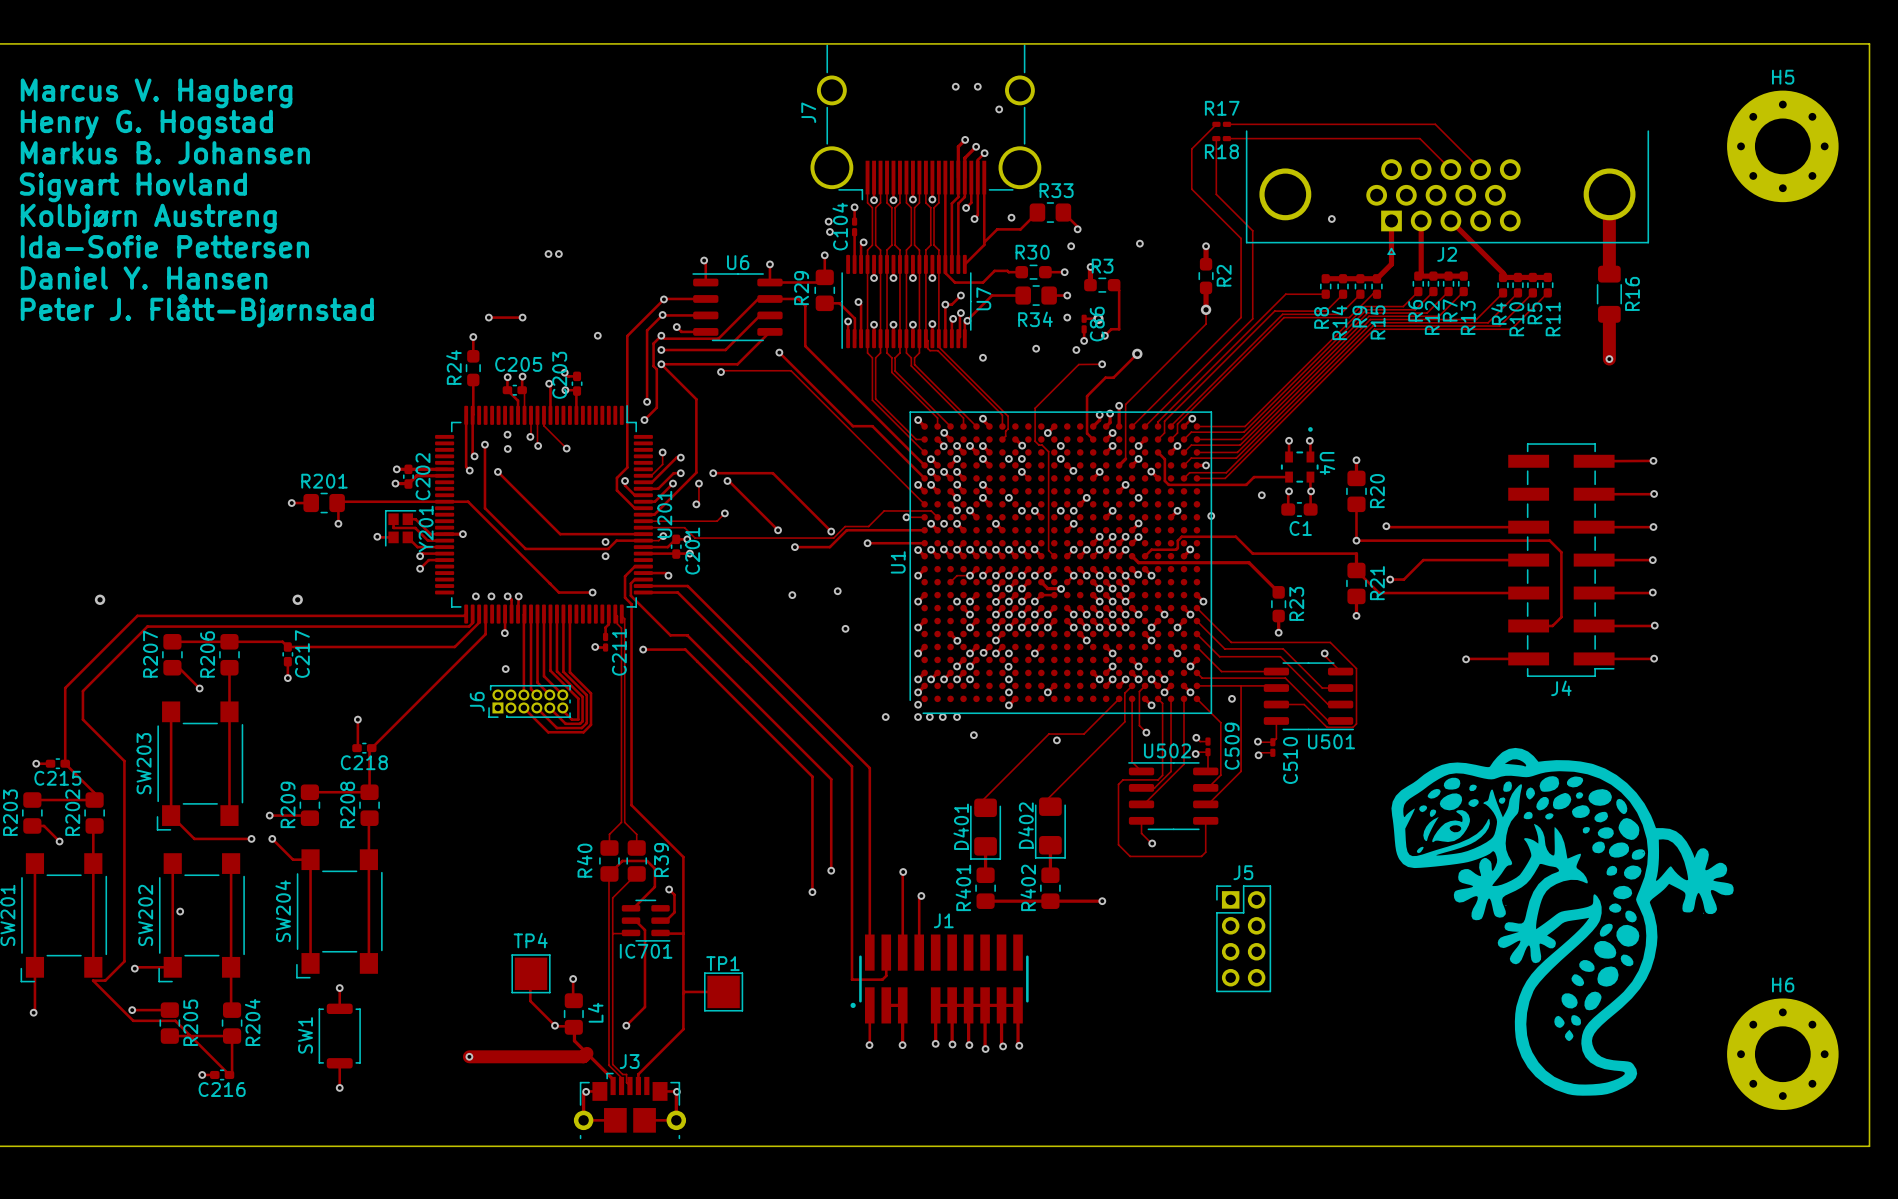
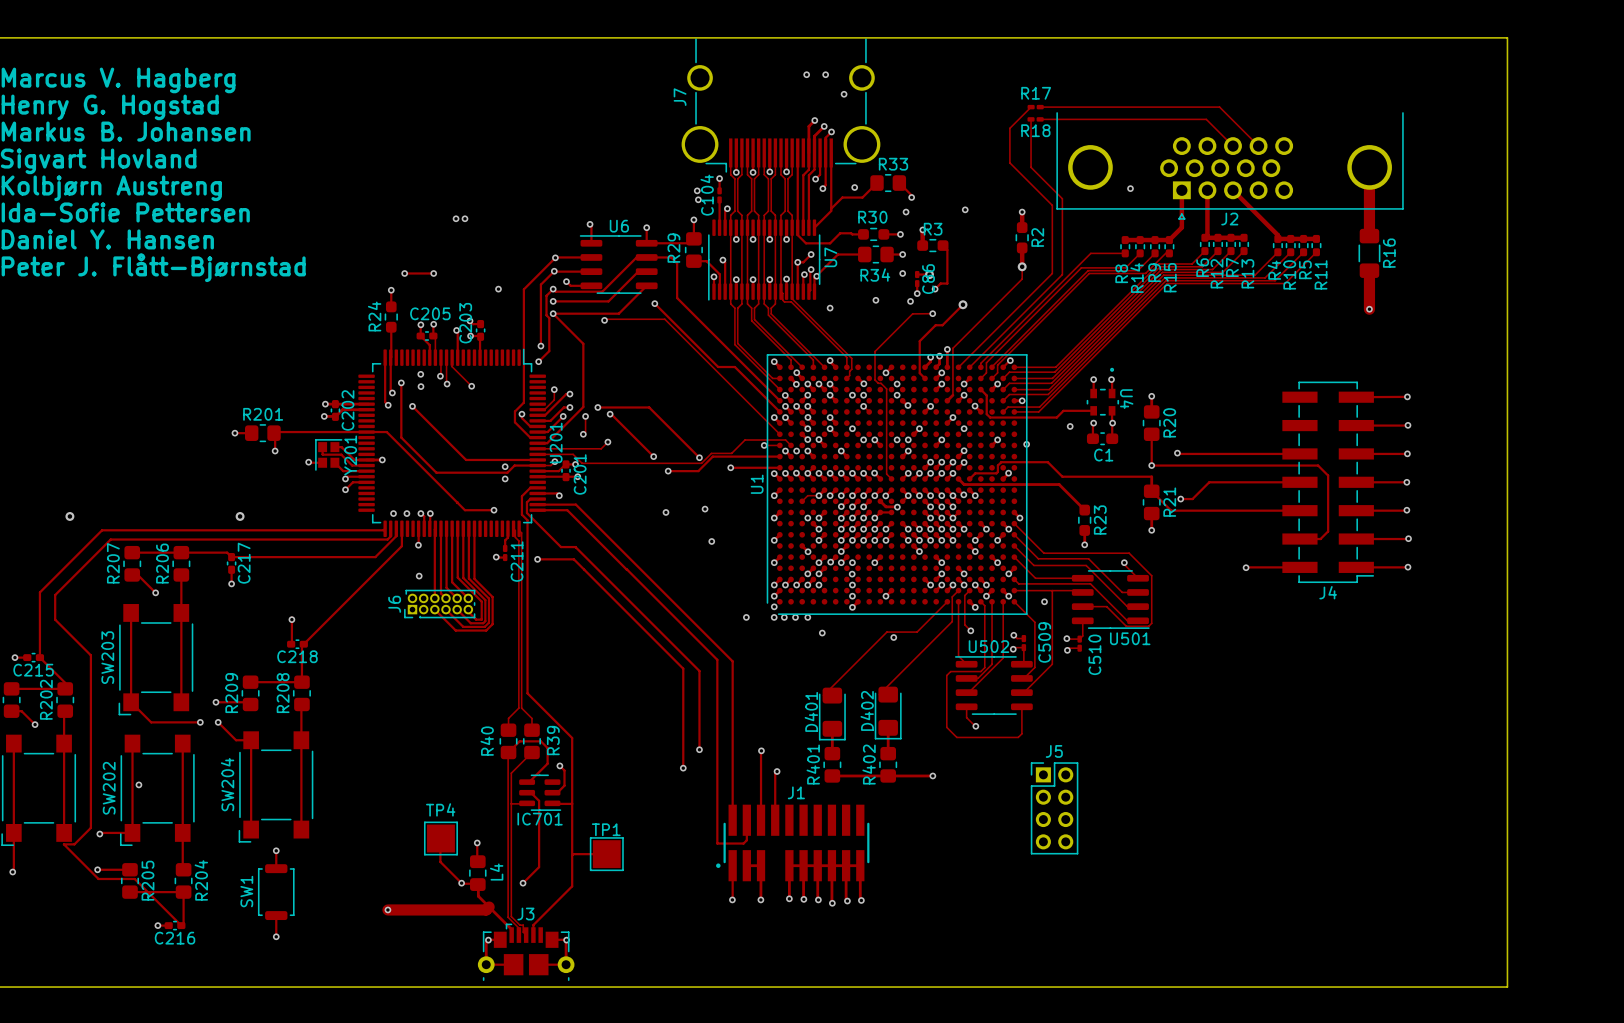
board edge: (1769, 43) (1869, 43) (1869, 1146) (1769, 1146) -> (1507, 37) (1507, 987)
H5: (1782, 146) -> none
drawing: [1391, 747, 1734, 1096] -> none
H6: (1782, 1054) -> none

